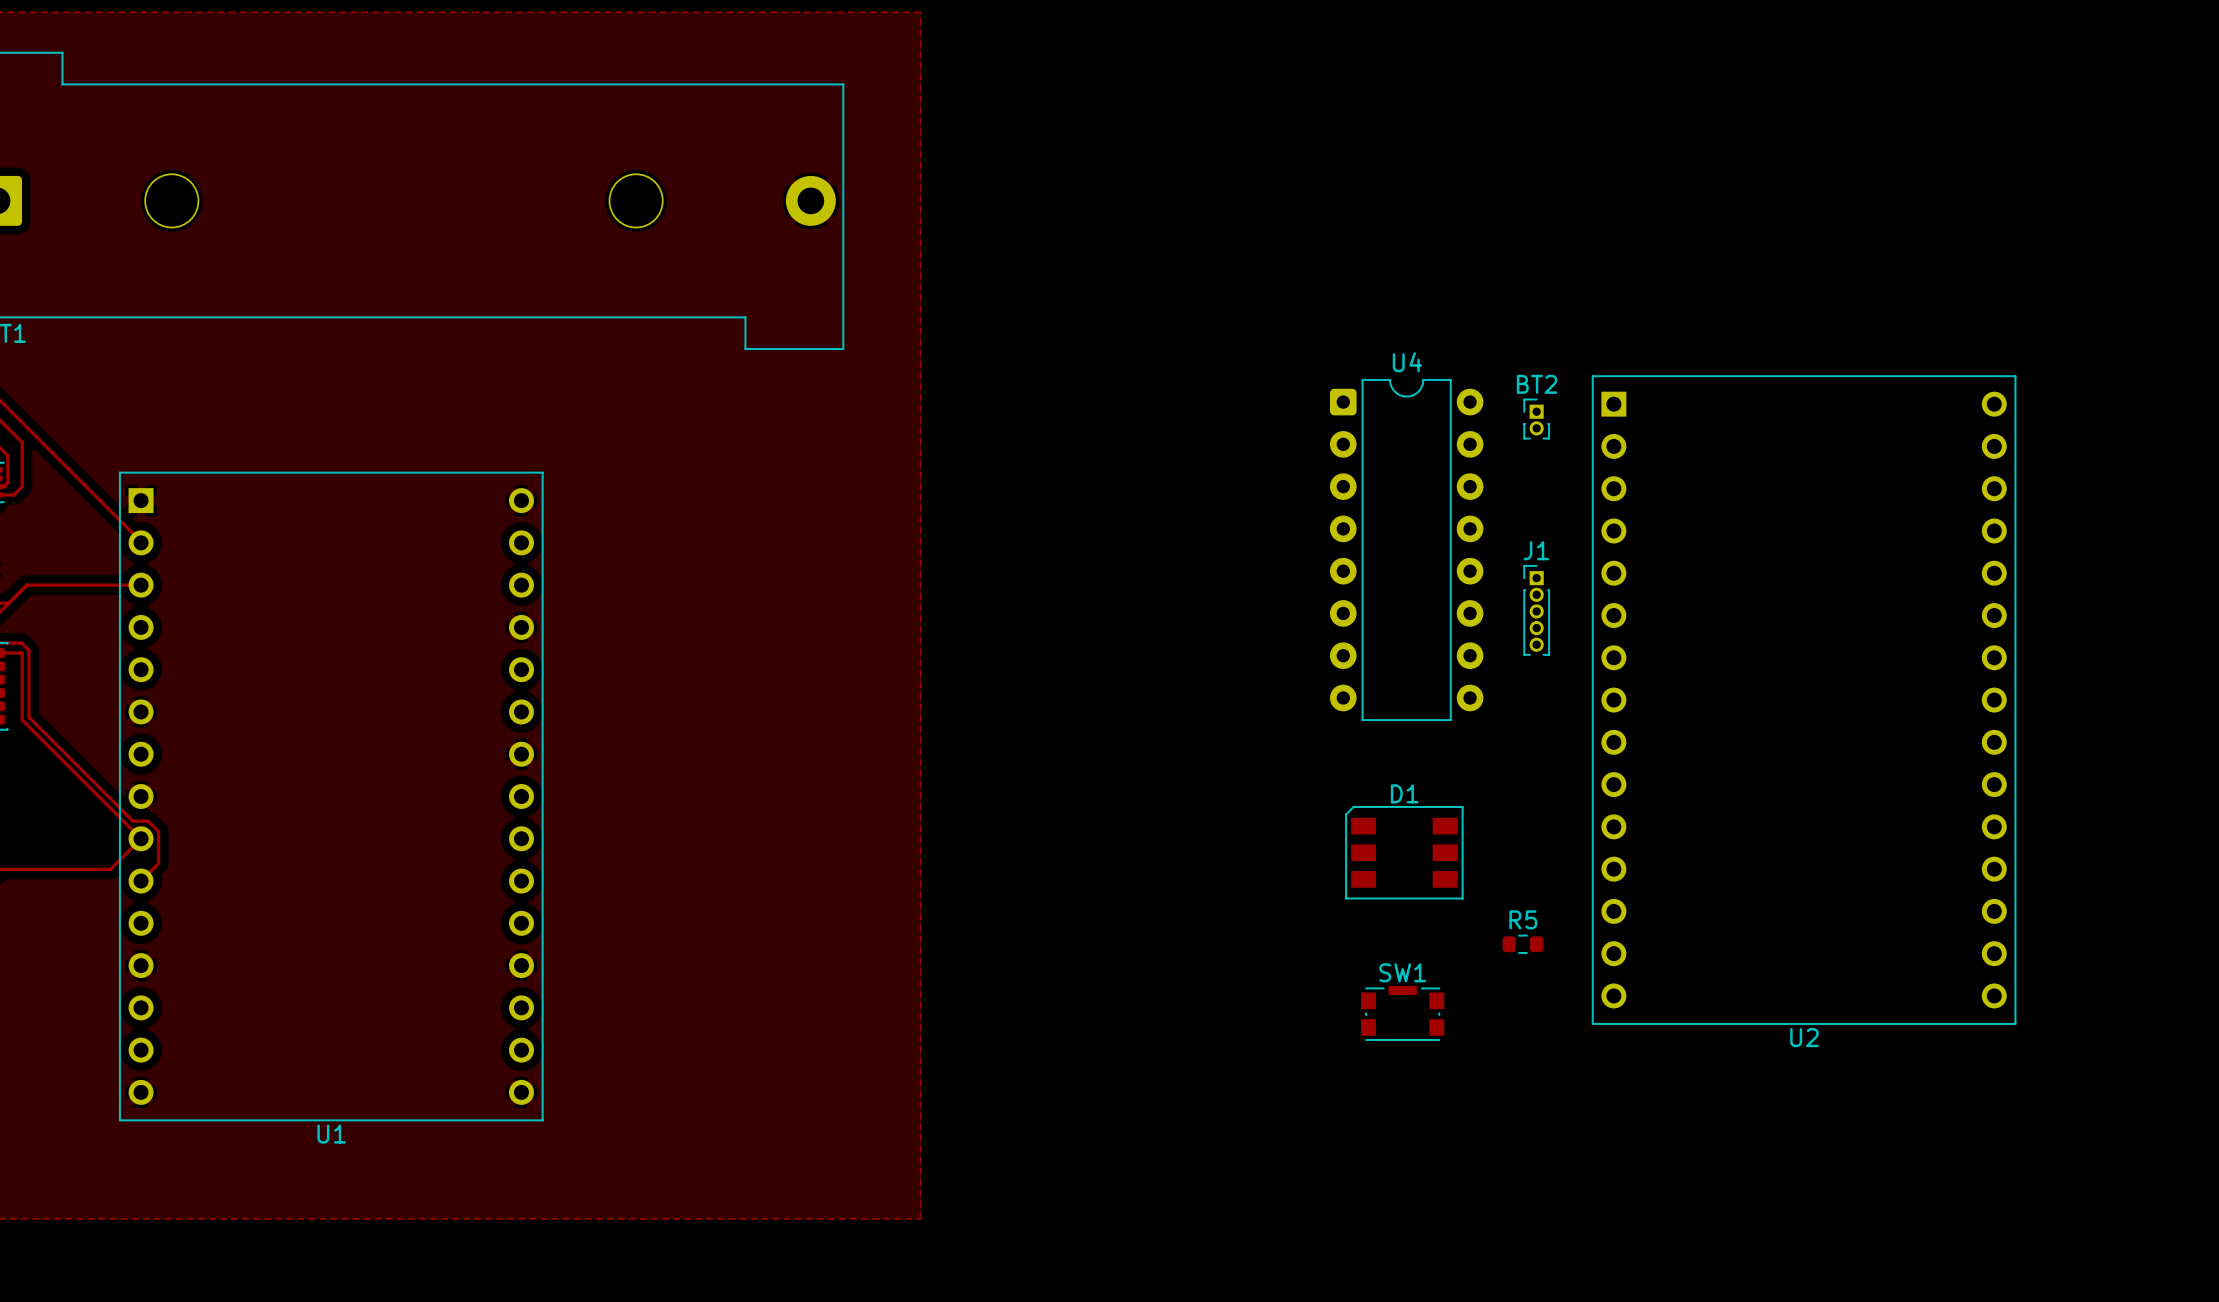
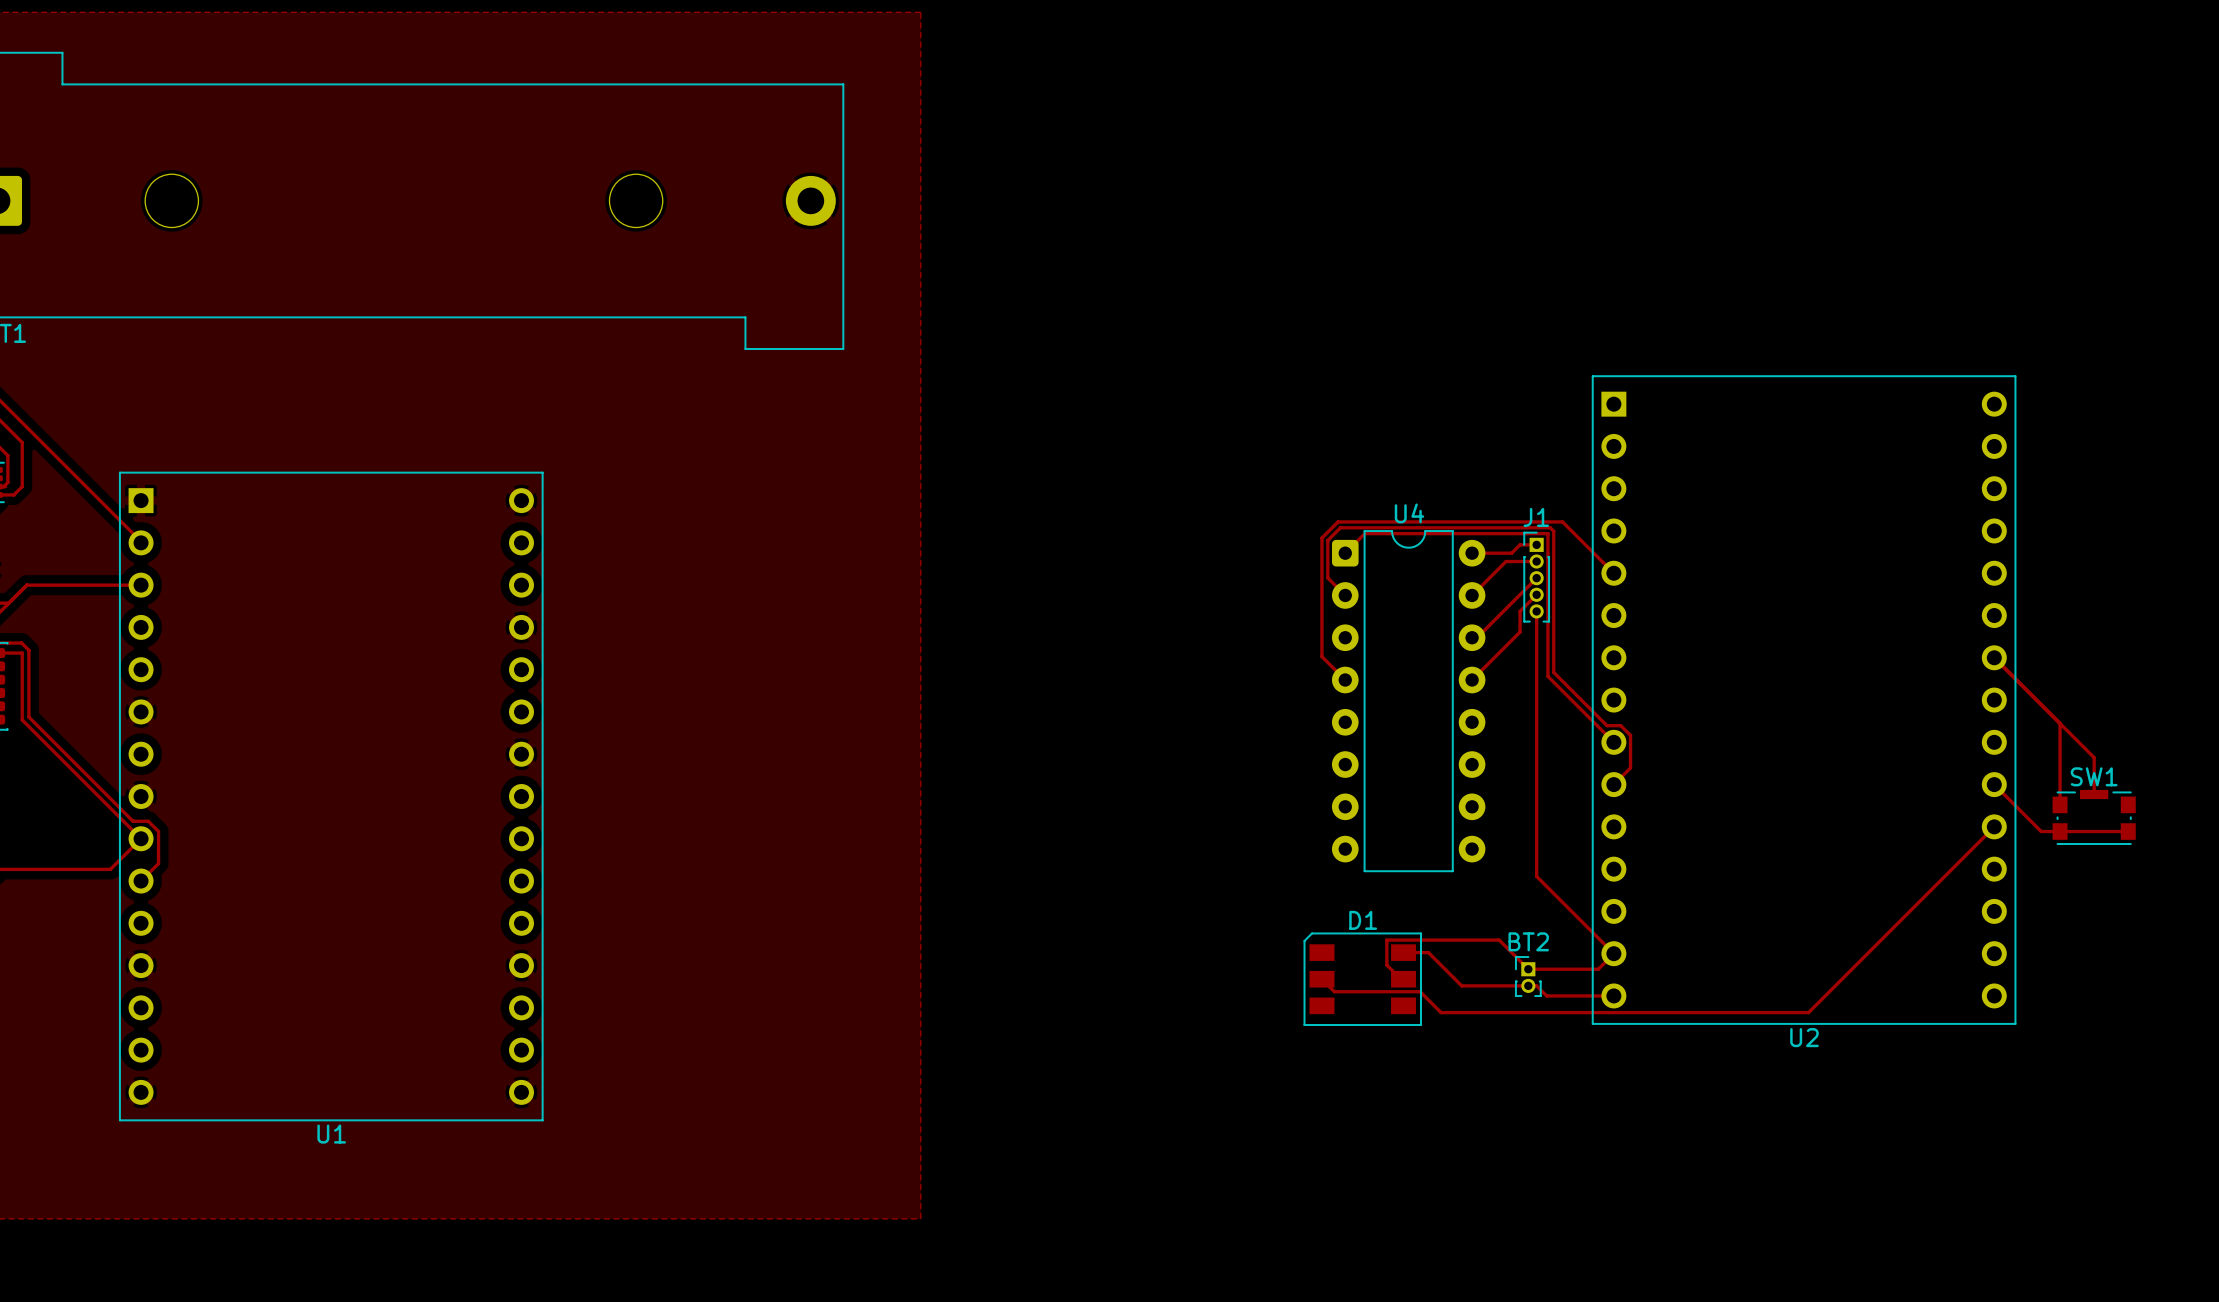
BT2 position: (1536, 419) -> (1528, 976)
track: none -> (1536, 544) (1520, 544) (1511, 553) (1472, 553)
U4 position: (1406, 550) -> (1408, 701)
track: none -> (1345, 553) (1364, 533) (1547, 533) (1547, 676) (1613, 742)
track: none -> (1536, 561) (1506, 561) (1472, 595)
track: none -> (1613, 573) (1562, 521) (1338, 521) (1321, 538) (1321, 656) (1345, 680)
track: none -> (1536, 578) (1477, 637) (1472, 637)
track: none -> (1536, 594) (1520, 611) (1520, 632) (1472, 680)
track: none -> (1345, 595) (1327, 577) (1327, 540) (1340, 527) (1550, 527) (1553, 531) (1553, 672) (1606, 725) (1620, 725) (1630, 735) (1630, 767) (1613, 784)
J1 position: (1536, 610) -> (1536, 577)
track: none -> (1536, 611) (1536, 876) (1613, 953) (1598, 969) (1528, 969) (1499, 940) (1386, 940) (1386, 965) (1400, 979) (1403, 979)
track: none -> (1994, 657) (2094, 757) (2094, 794)
track: none -> (2060, 723) (2060, 804)
track: none -> (1994, 784) (2041, 831) (2128, 831)
track: none -> (1994, 826) (1808, 1012) (1441, 1012) (1420, 991) (1334, 991) (1321, 979)
D1 position: (1404, 852) -> (1362, 979)
R5: (1522, 944) -> none
track: none -> (1403, 952) (1428, 952) (1461, 985) (1536, 985) (1546, 995) (1613, 995)
SW1 position: (1402, 1013) -> (2094, 817)

